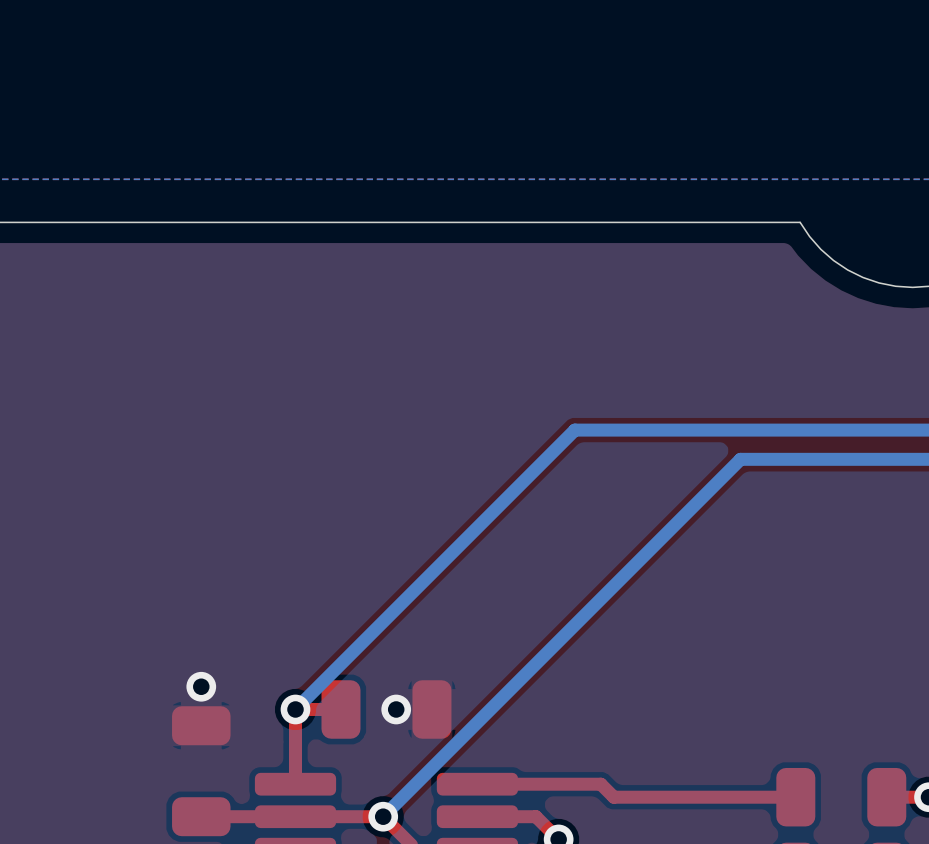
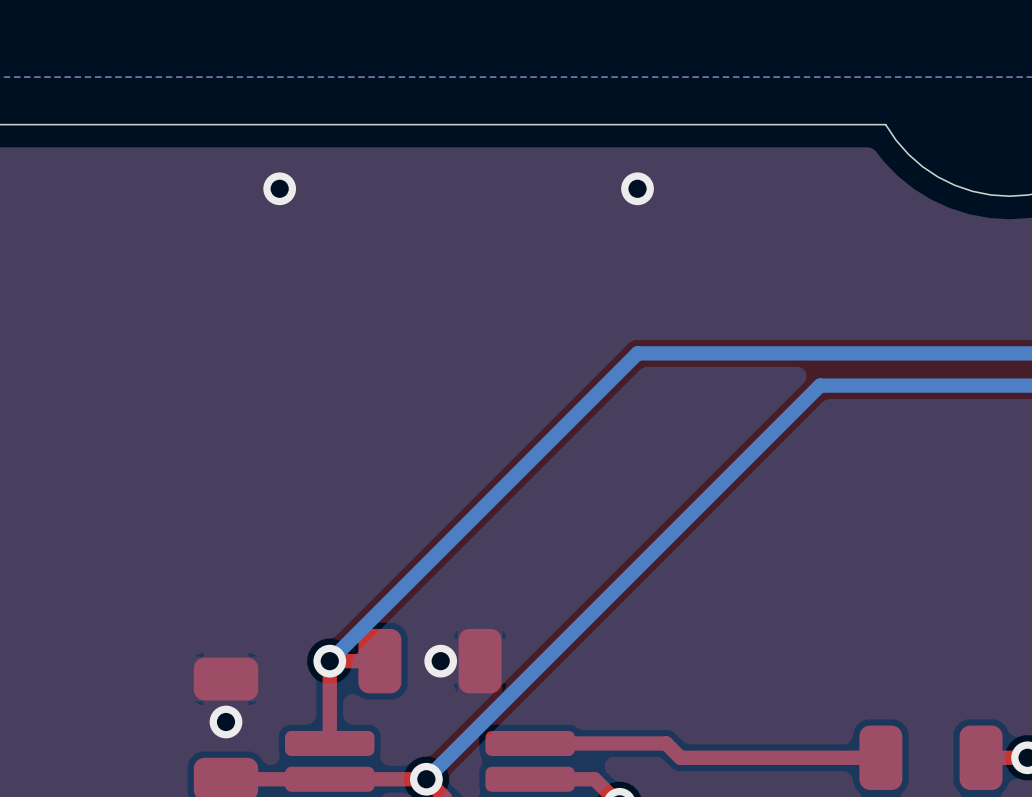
via: none -> (279, 188)
via: none -> (637, 188)
via position: (201, 686) -> (226, 721)

